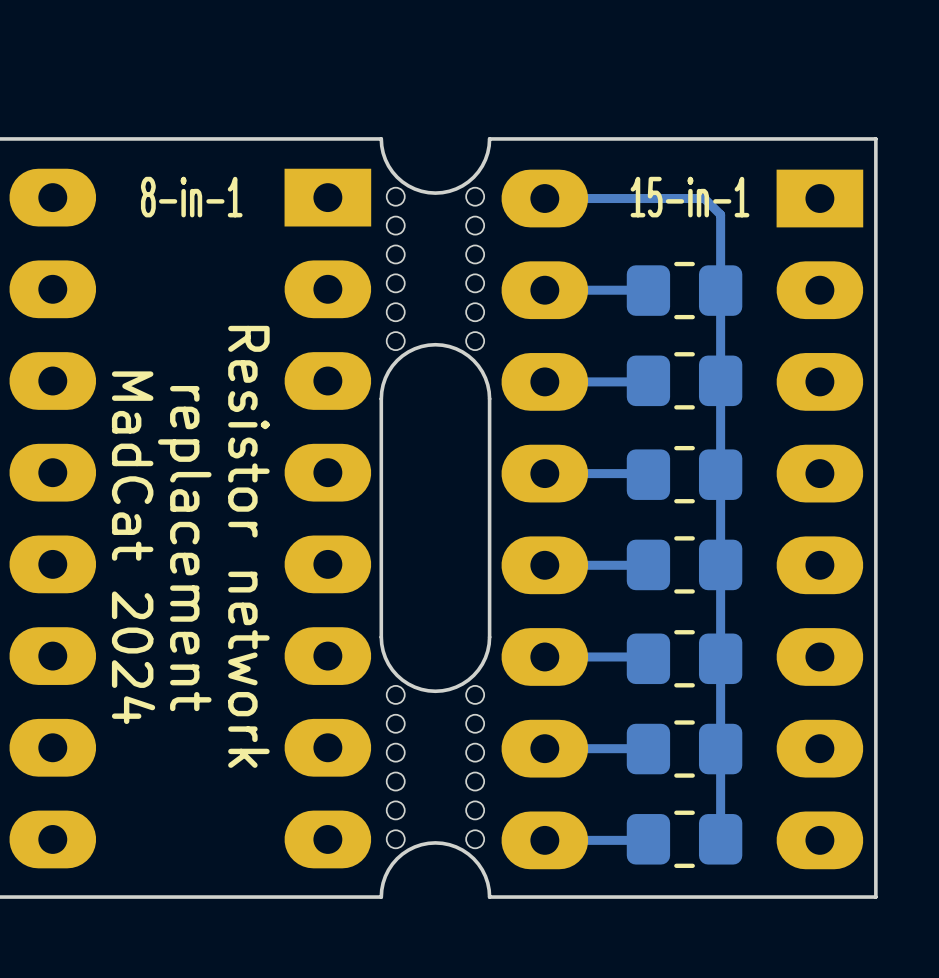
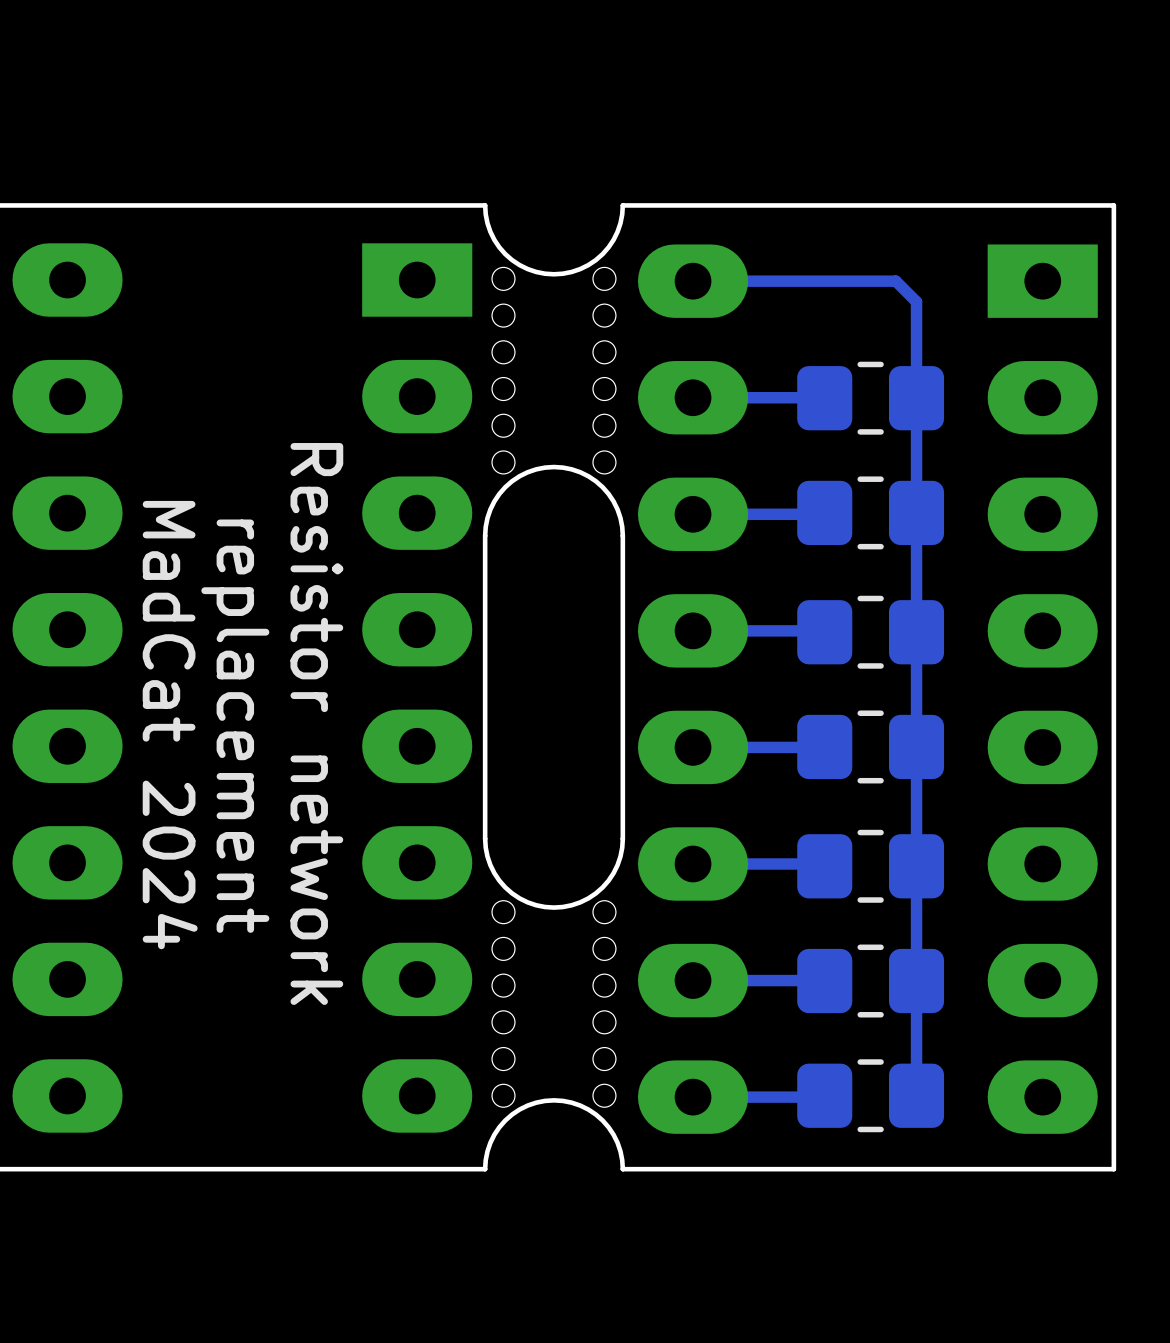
text: 8-in-1 (191, 197) -> none
text: 15-in-1 (690, 197) -> none

